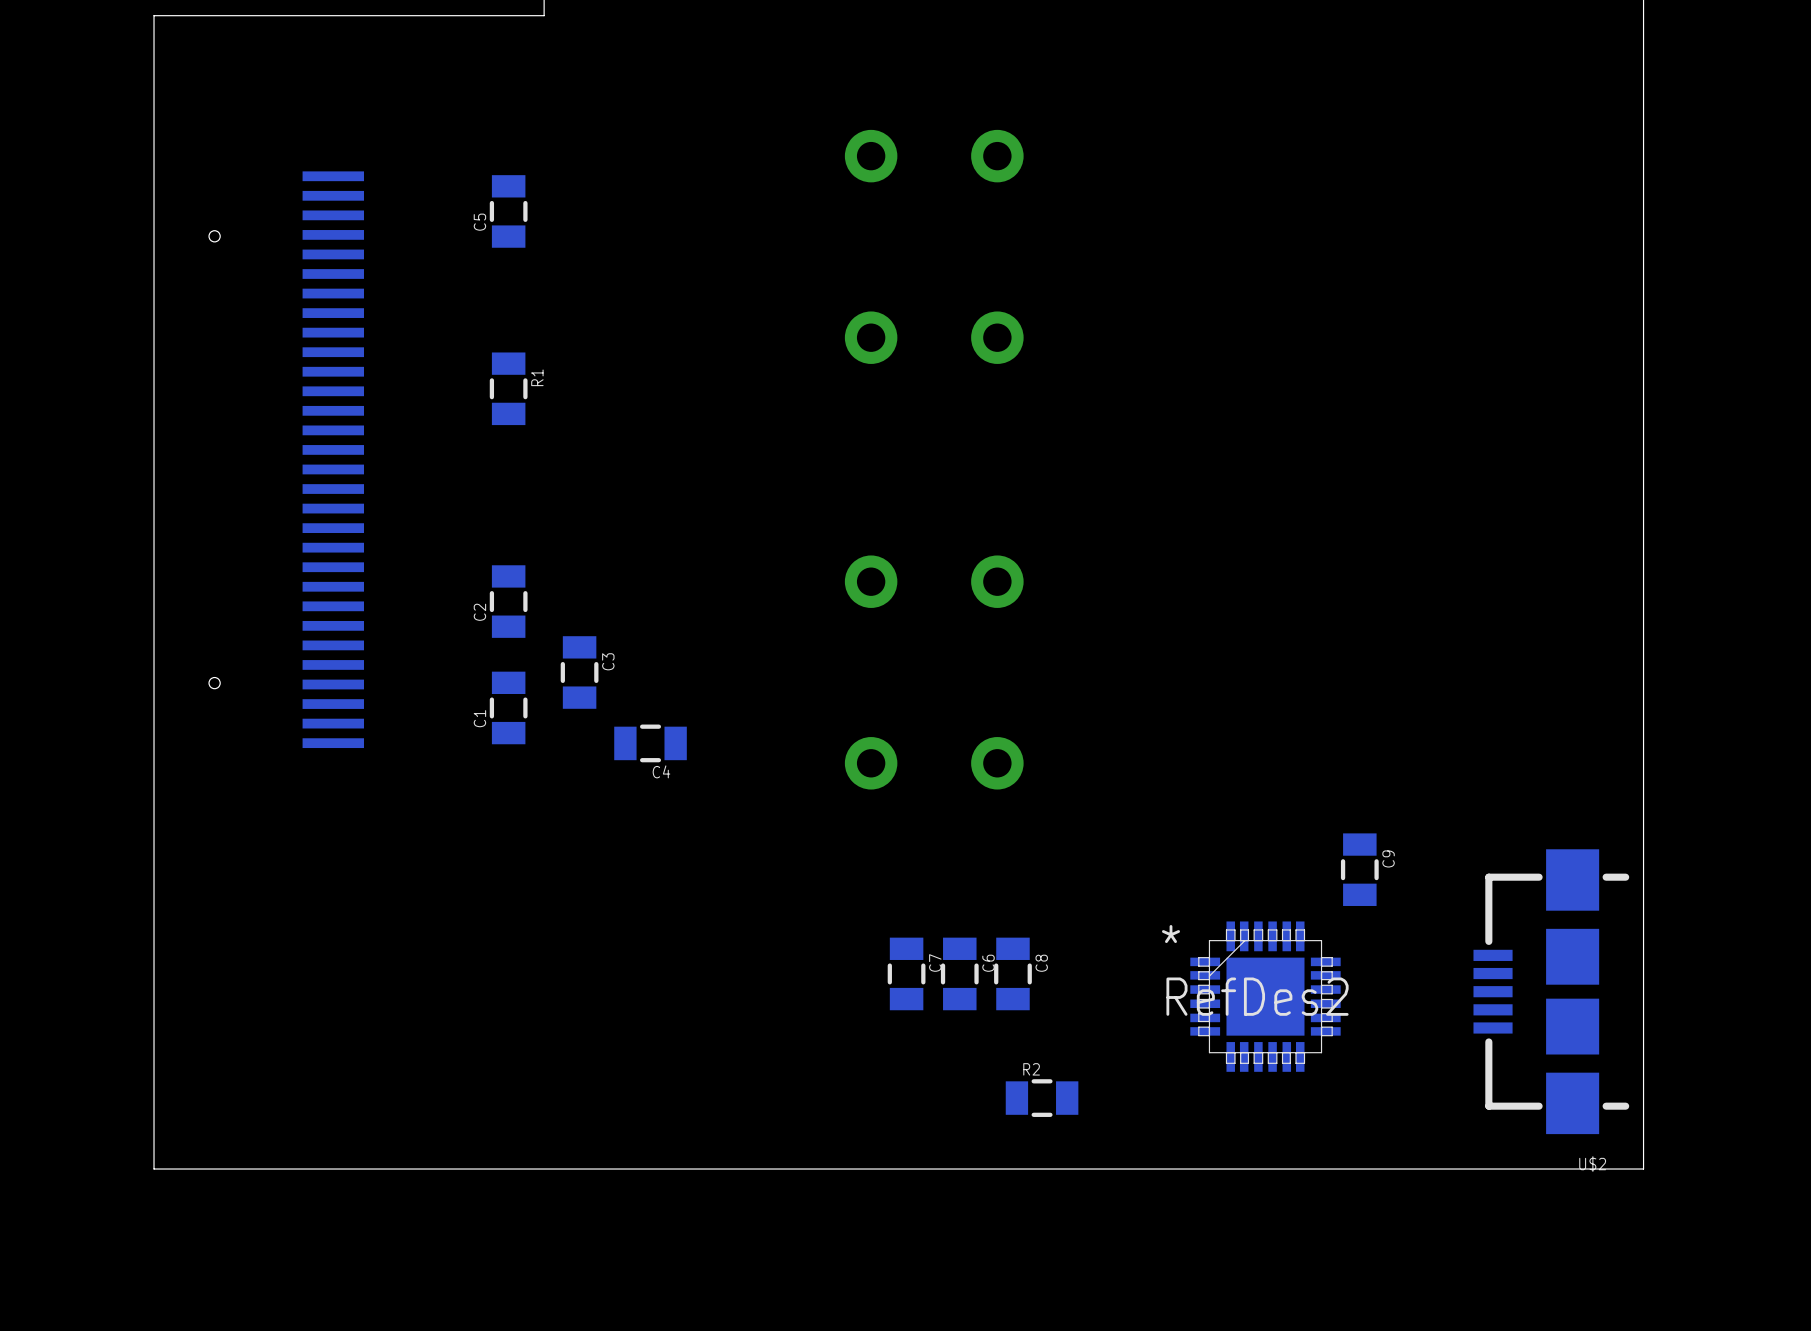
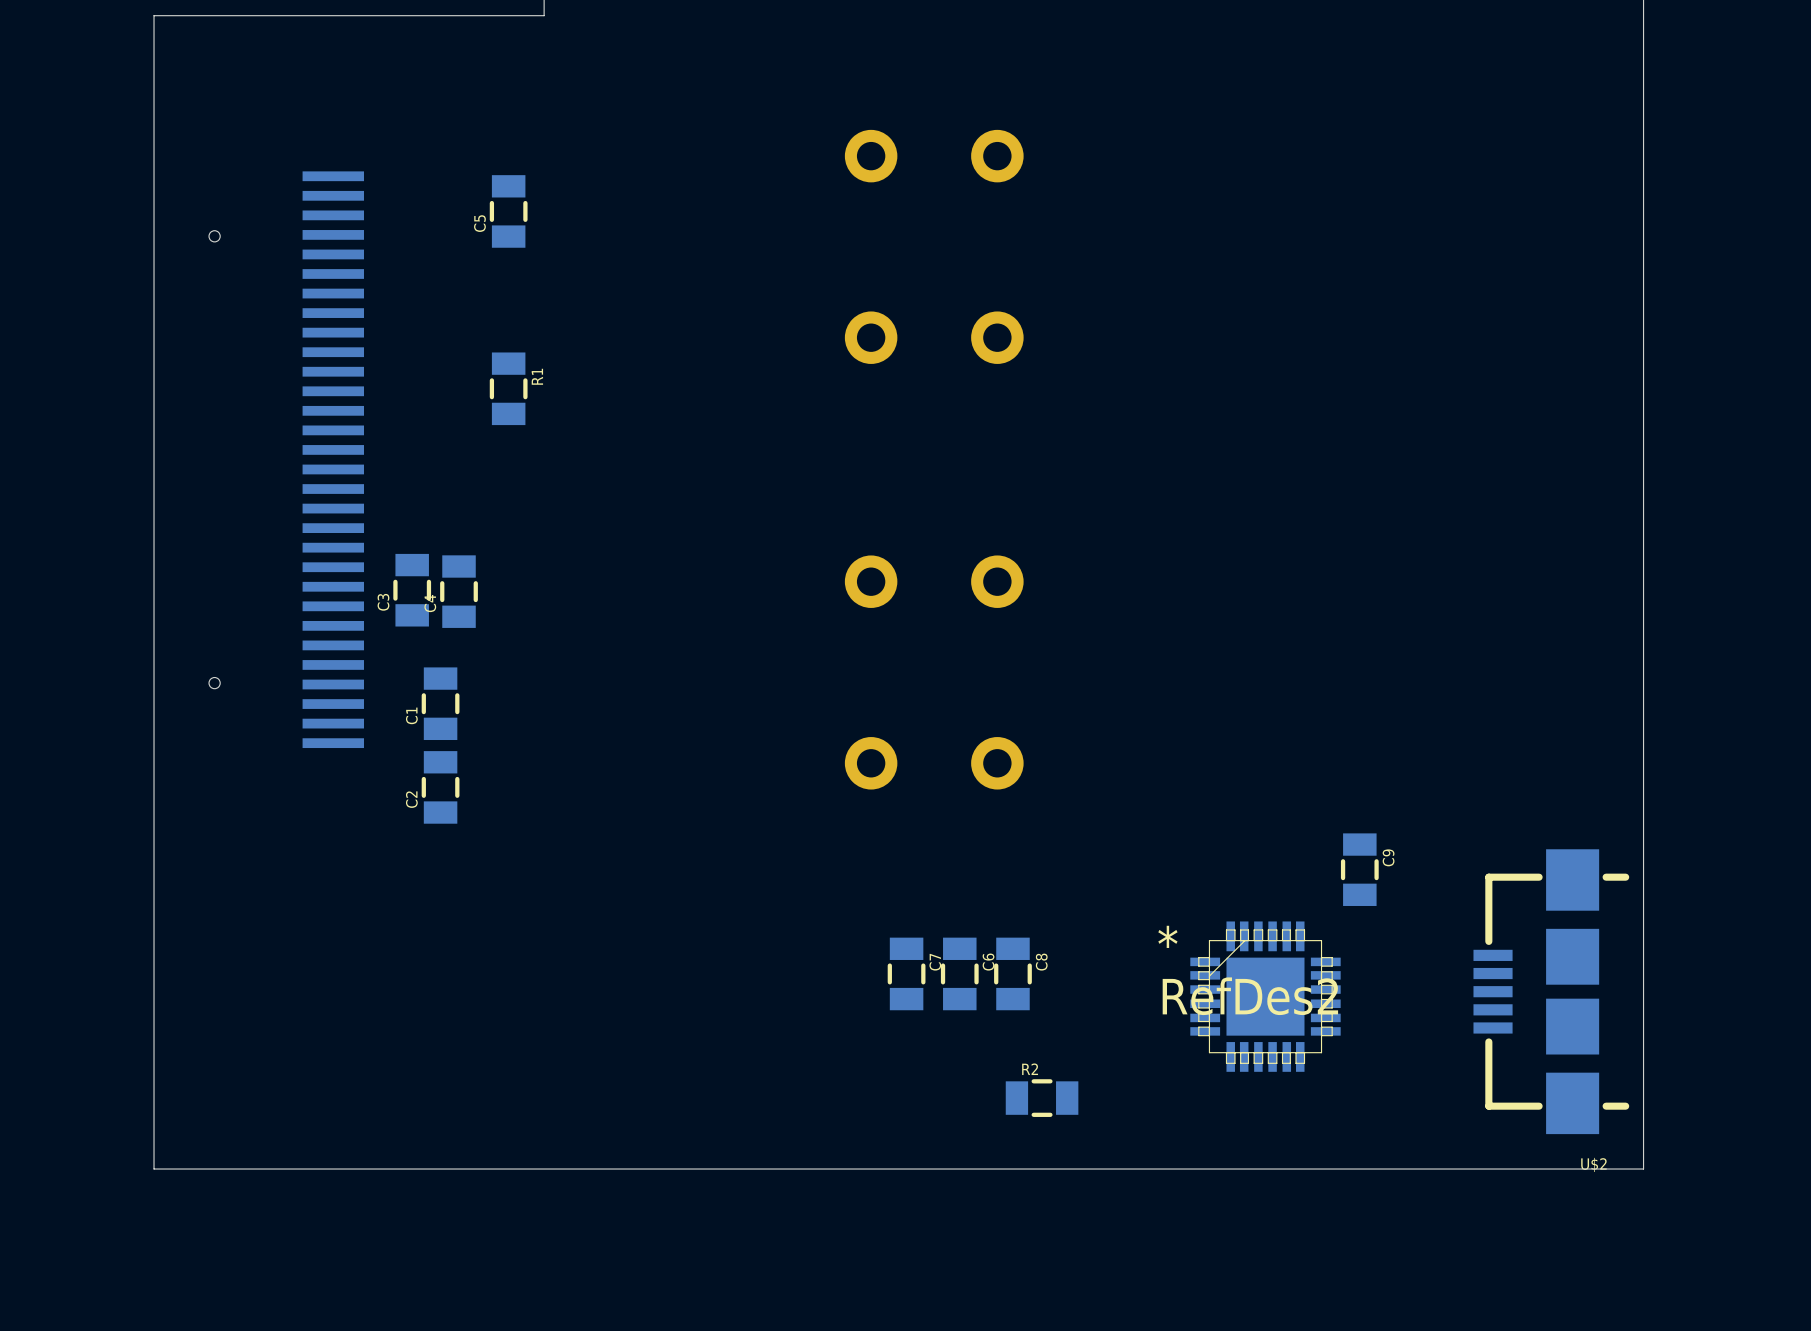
C2 position: (508, 601) -> (440, 787)
C3 name position: C3 (608, 661) -> C3 (383, 602)
C3 position: (579, 672) -> (412, 590)
C1 position: (508, 707) -> (440, 703)
C4 rotation: 0° (650, 743) -> 90° clockwise (459, 591)
C4 position: (650, 743) -> (459, 591)

